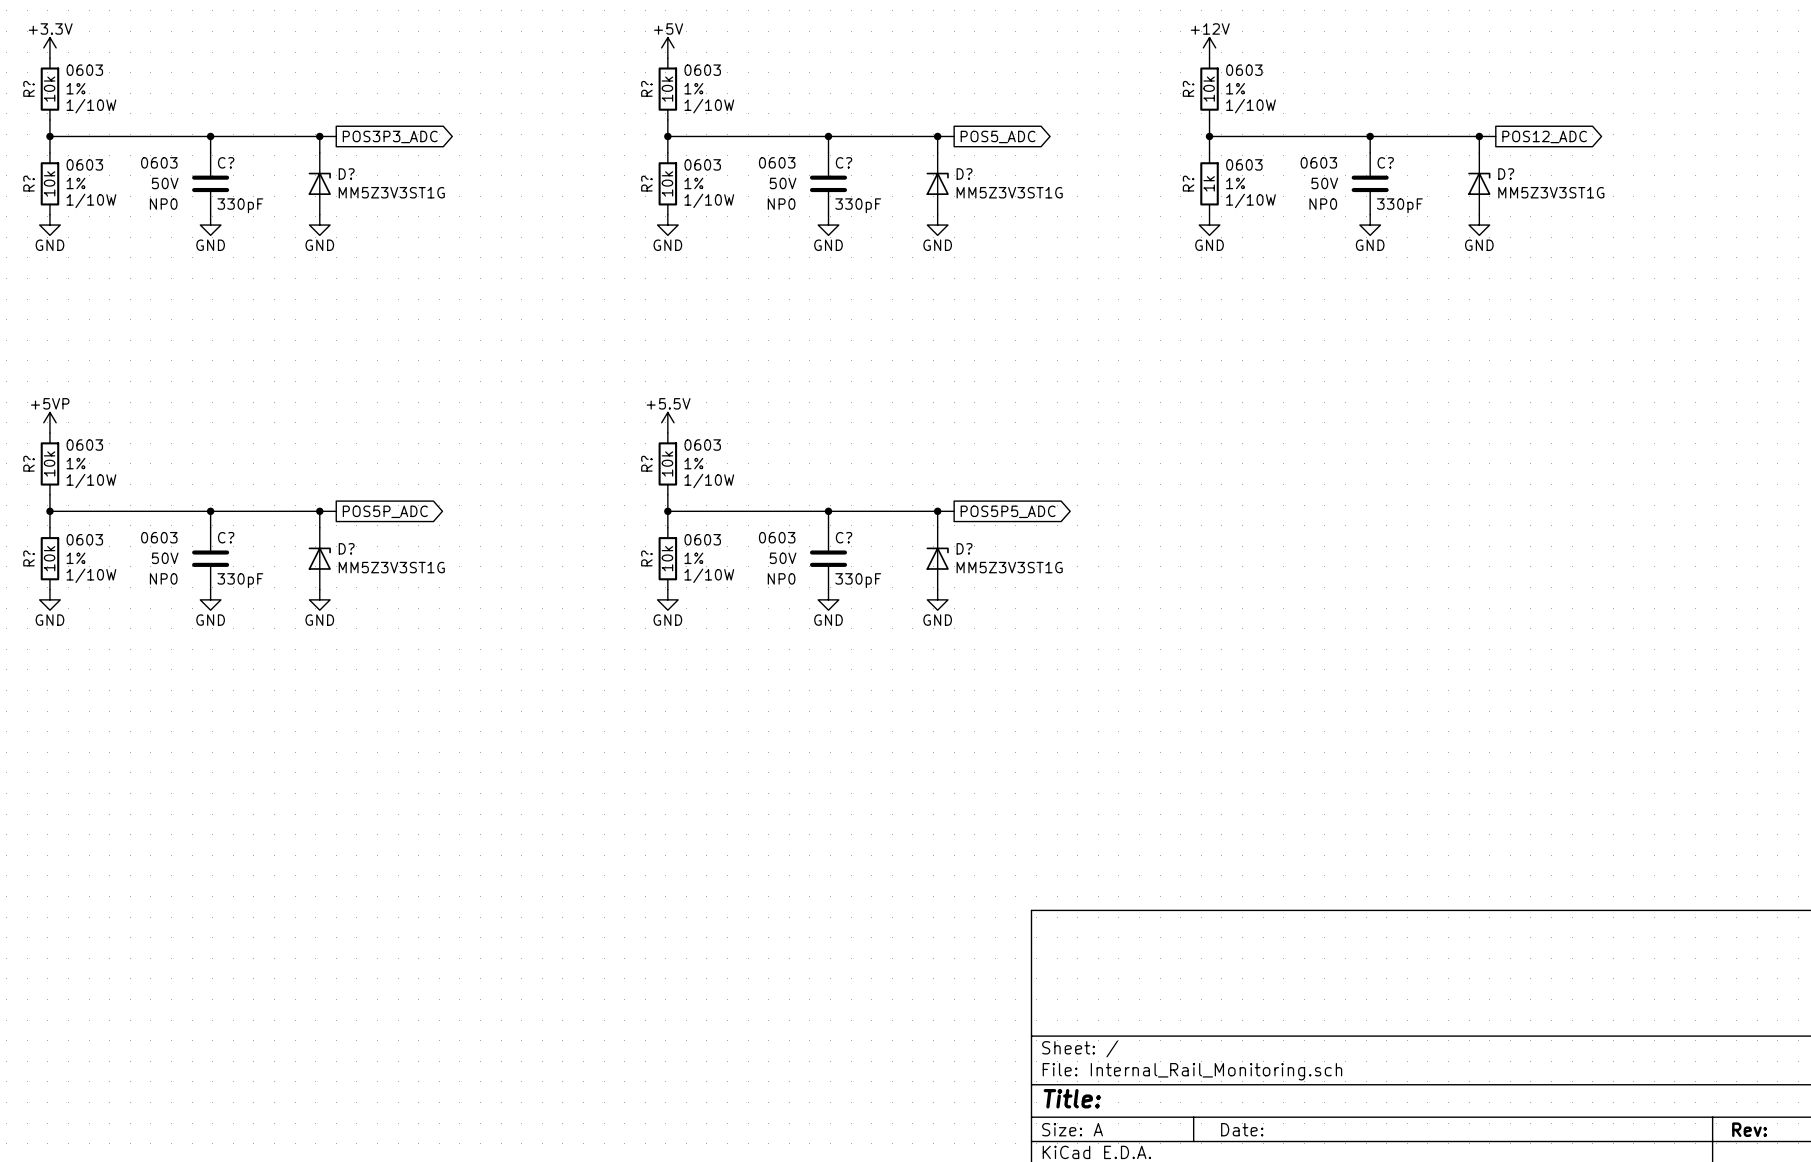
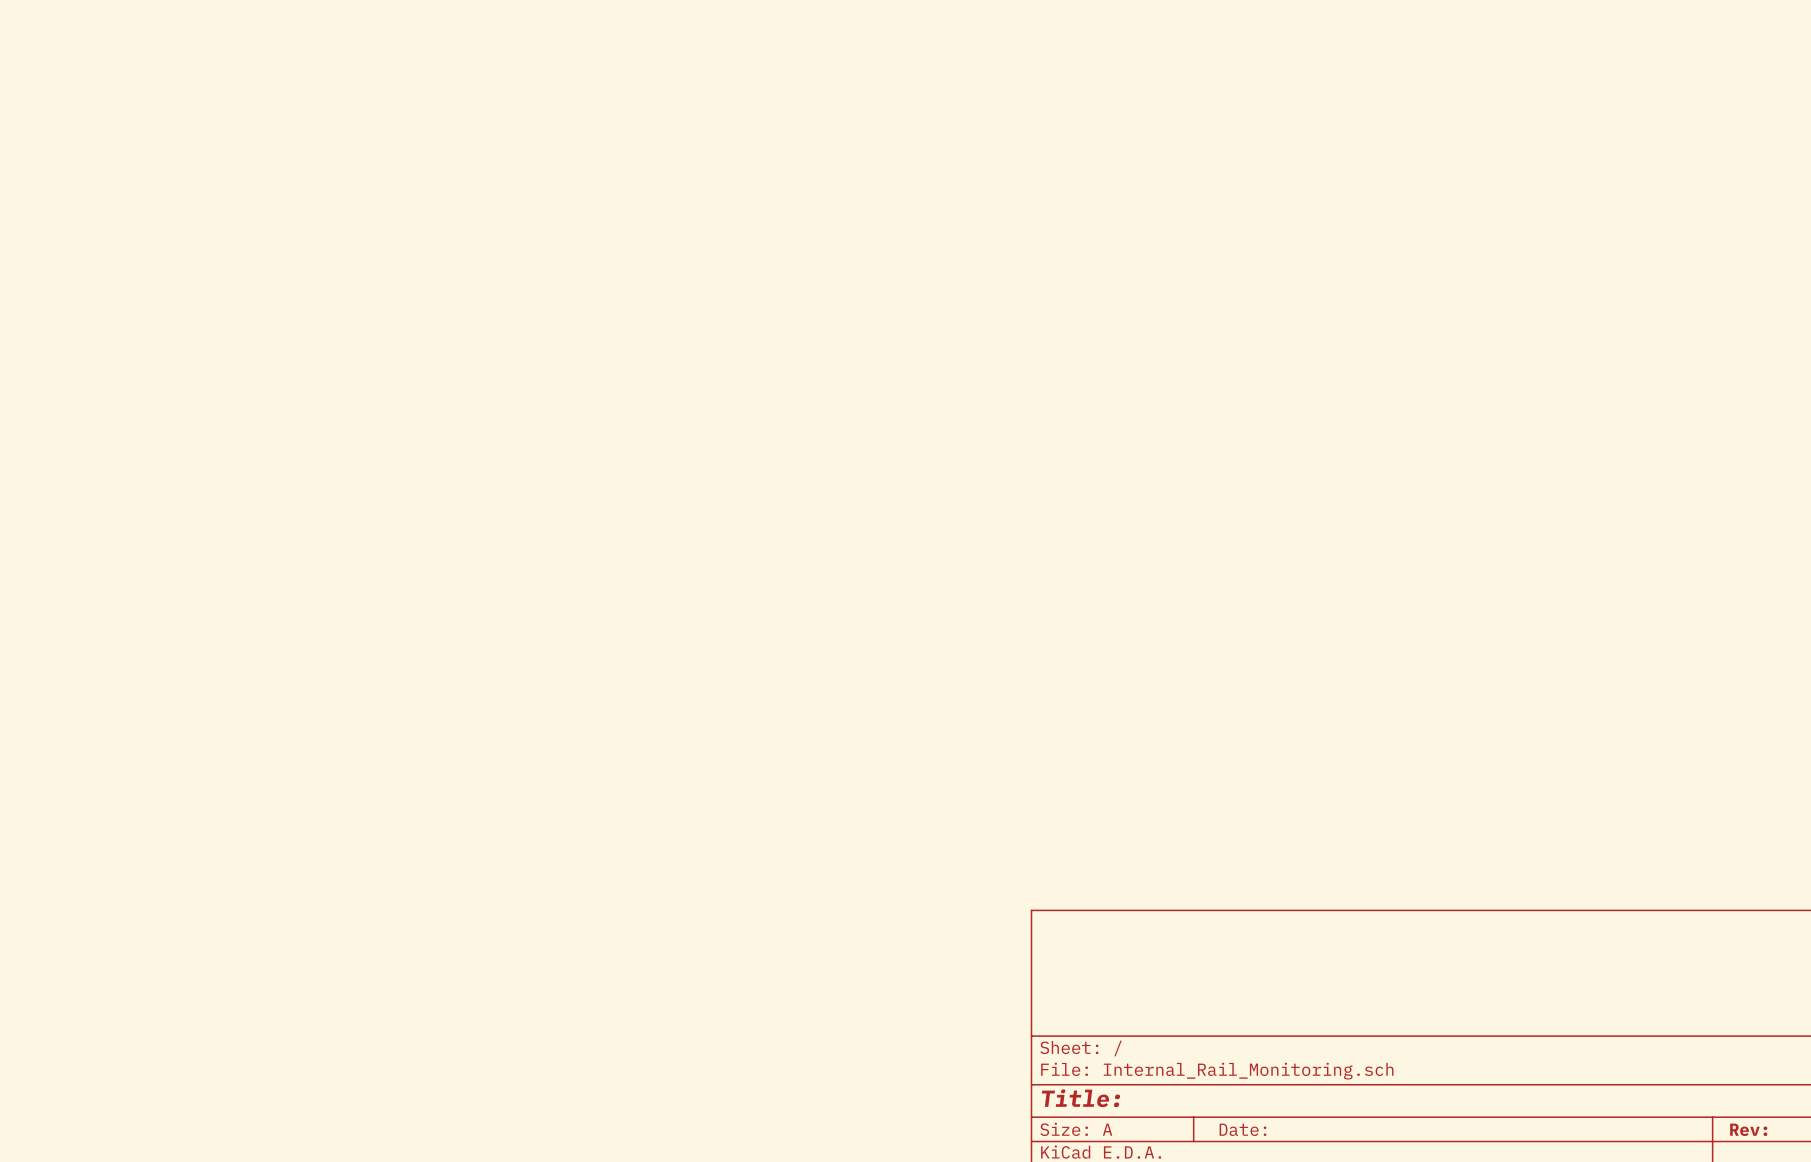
power symbol: +3.3V (49, 47) -> none
power symbol: +5V (667, 47) -> none
power symbol: +12V (1209, 47) -> none
R?: 10k (49, 89) -> none
R?: 10k (667, 89) -> none
R?: 10k (1209, 89) -> none
wire: (49, 120) (49, 152) -> none
wire: (667, 120) (667, 152) -> none
wire: (1209, 120) (1209, 152) -> none
wire: (49, 136) (336, 136) -> none
junction: (49, 136) -> none
wire: (210, 136) (210, 152) -> none
junction: (210, 136) -> none
wire: (319, 136) (319, 152) -> none
junction: (319, 136) -> none
global label: POS3P3_ADC (390, 136) -> none
wire: (667, 136) (954, 136) -> none
junction: (667, 136) -> none
wire: (828, 136) (828, 152) -> none
junction: (828, 136) -> none
wire: (937, 136) (937, 152) -> none
junction: (937, 136) -> none
global label: POS5_ADC (998, 136) -> none
wire: (1209, 136) (1495, 136) -> none
junction: (1209, 136) -> none
wire: (1370, 136) (1370, 152) -> none
junction: (1370, 136) -> none
wire: (1479, 136) (1479, 152) -> none
junction: (1479, 136) -> none
global label: POS12_ADC (1544, 136) -> none
R?: 10k (49, 183) -> none
C?: 330pF (210, 183) -> none
D?: MM5Z3V3ST1G (319, 183) -> none
R?: 10k (667, 183) -> none
C?: 330pF (828, 183) -> none
D?: MM5Z3V3ST1G (937, 183) -> none
R?: 1k (1209, 183) -> none
C?: 330pF (1370, 183) -> none
D?: MM5Z3V3ST1G (1479, 183) -> none
power symbol: GND (49, 225) -> none
power symbol: GND (210, 225) -> none
power symbol: GND (319, 225) -> none
power symbol: GND (667, 225) -> none
power symbol: GND (828, 225) -> none
power symbol: GND (937, 225) -> none
power symbol: GND (1209, 225) -> none
power symbol: GND (1370, 225) -> none
power symbol: GND (1479, 225) -> none
power symbol: +5VP (49, 422) -> none
power symbol: +5.5V (667, 422) -> none
R?: 10k (49, 463) -> none
R?: 10k (667, 463) -> none
wire: (49, 494) (49, 527) -> none
wire: (667, 494) (667, 527) -> none
wire: (49, 511) (336, 511) -> none
junction: (49, 511) -> none
wire: (210, 511) (210, 527) -> none
junction: (210, 511) -> none
wire: (319, 511) (319, 527) -> none
junction: (319, 511) -> none
global label: POS5P_ADC (385, 511) -> none
wire: (667, 511) (954, 511) -> none
junction: (667, 511) -> none
wire: (828, 511) (828, 527) -> none
junction: (828, 511) -> none
wire: (937, 511) (937, 527) -> none
junction: (937, 511) -> none
global label: POS5P5_ADC (1008, 511) -> none
R?: 10k (49, 558) -> none
C?: 330pF (210, 558) -> none
D?: MM5Z3V3ST1G (319, 558) -> none
R?: 10k (667, 558) -> none
C?: 330pF (828, 558) -> none
D?: MM5Z3V3ST1G (937, 558) -> none
power symbol: GND (49, 599) -> none
power symbol: GND (210, 599) -> none
power symbol: GND (319, 599) -> none
power symbol: GND (667, 599) -> none
power symbol: GND (828, 599) -> none
power symbol: GND (937, 599) -> none

